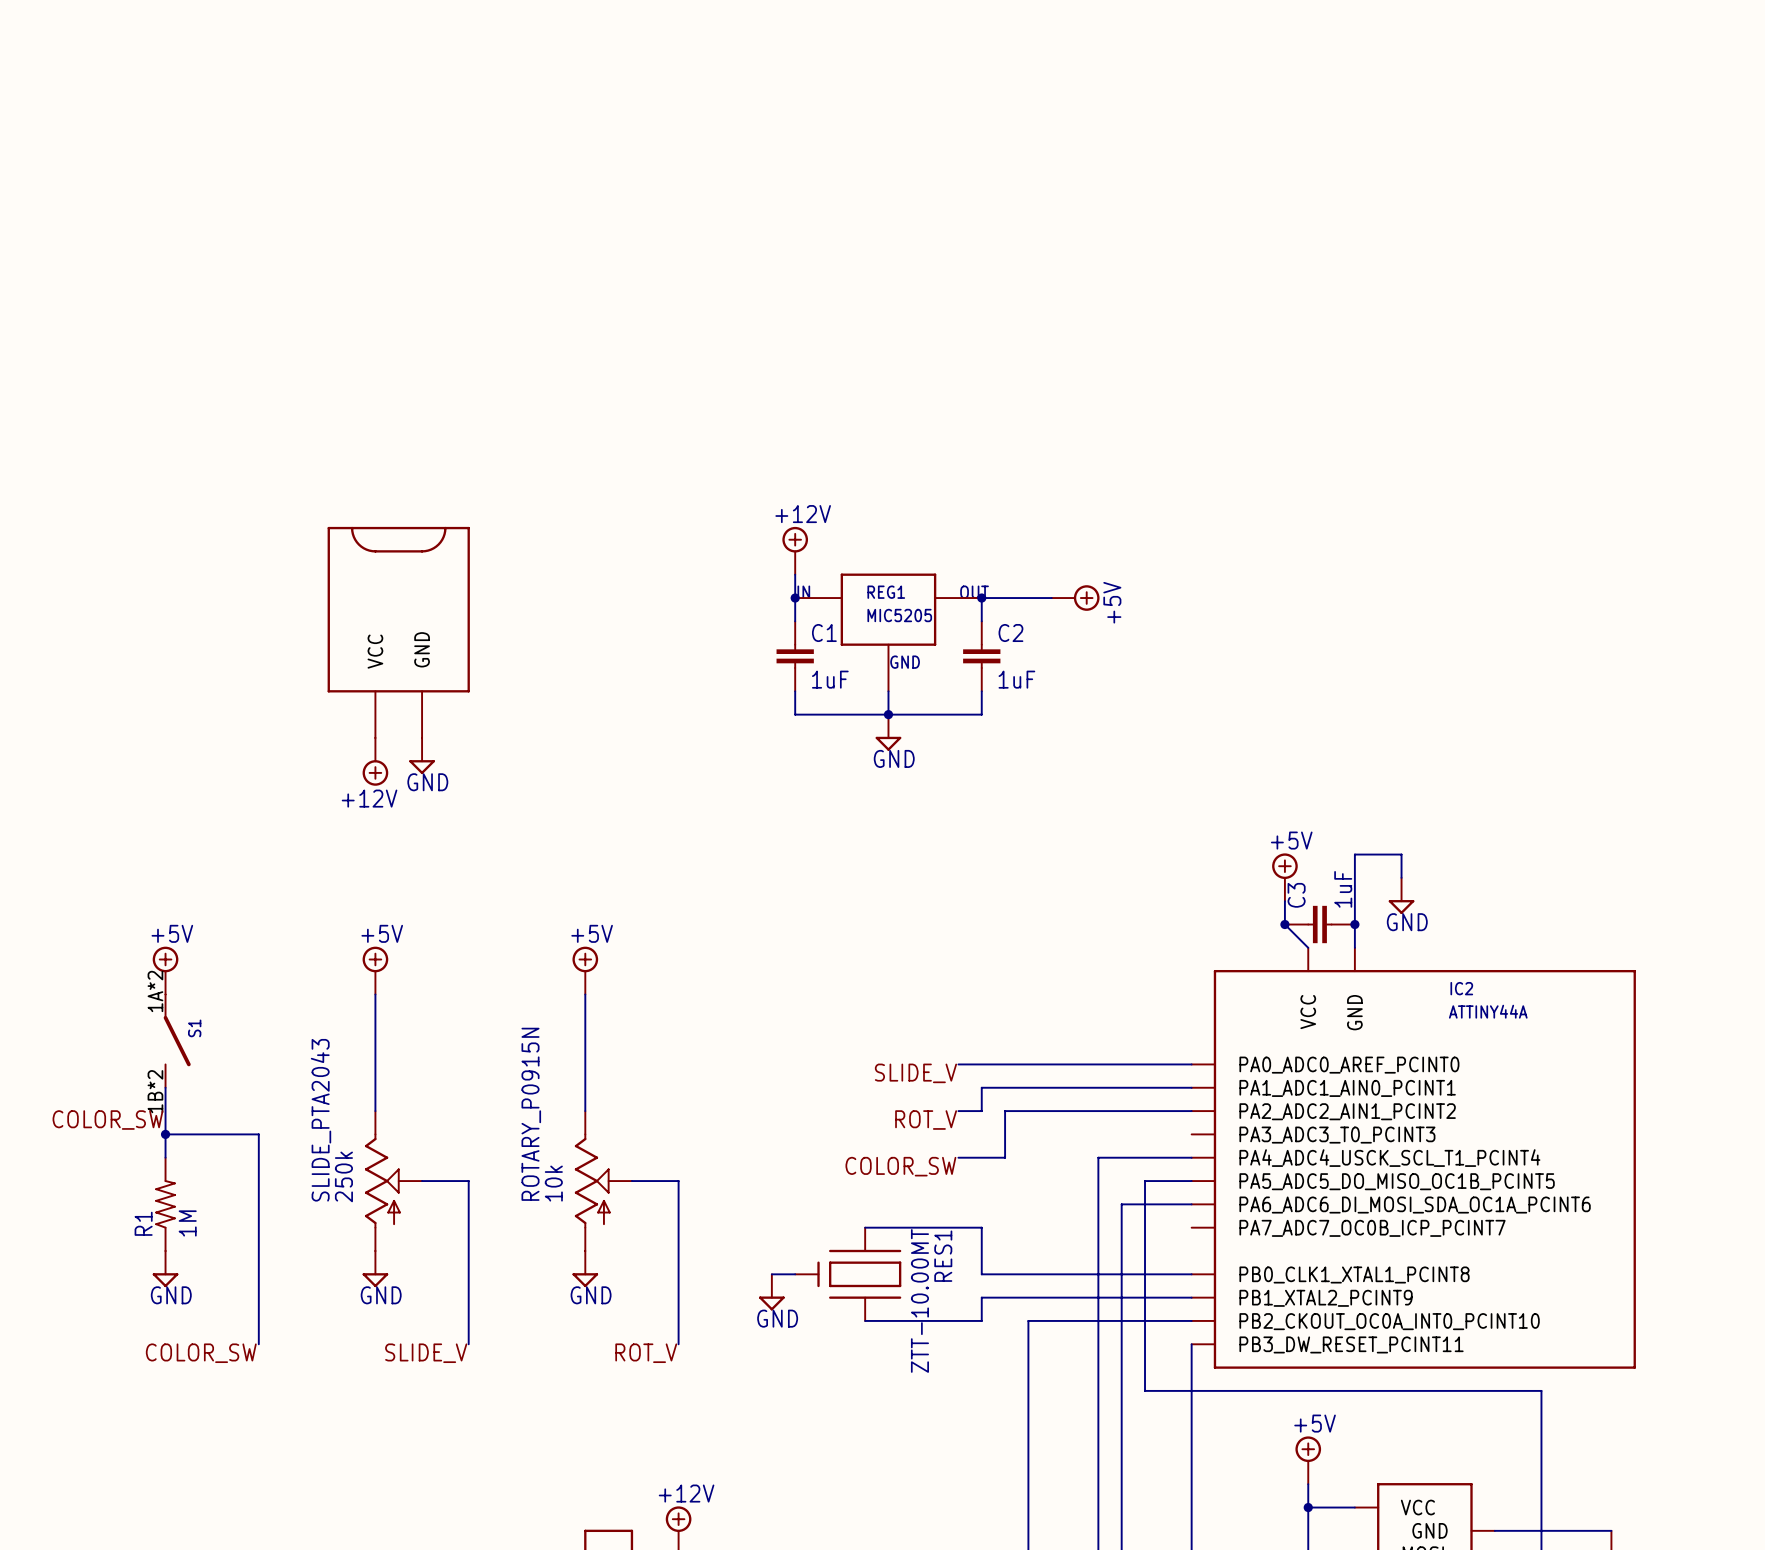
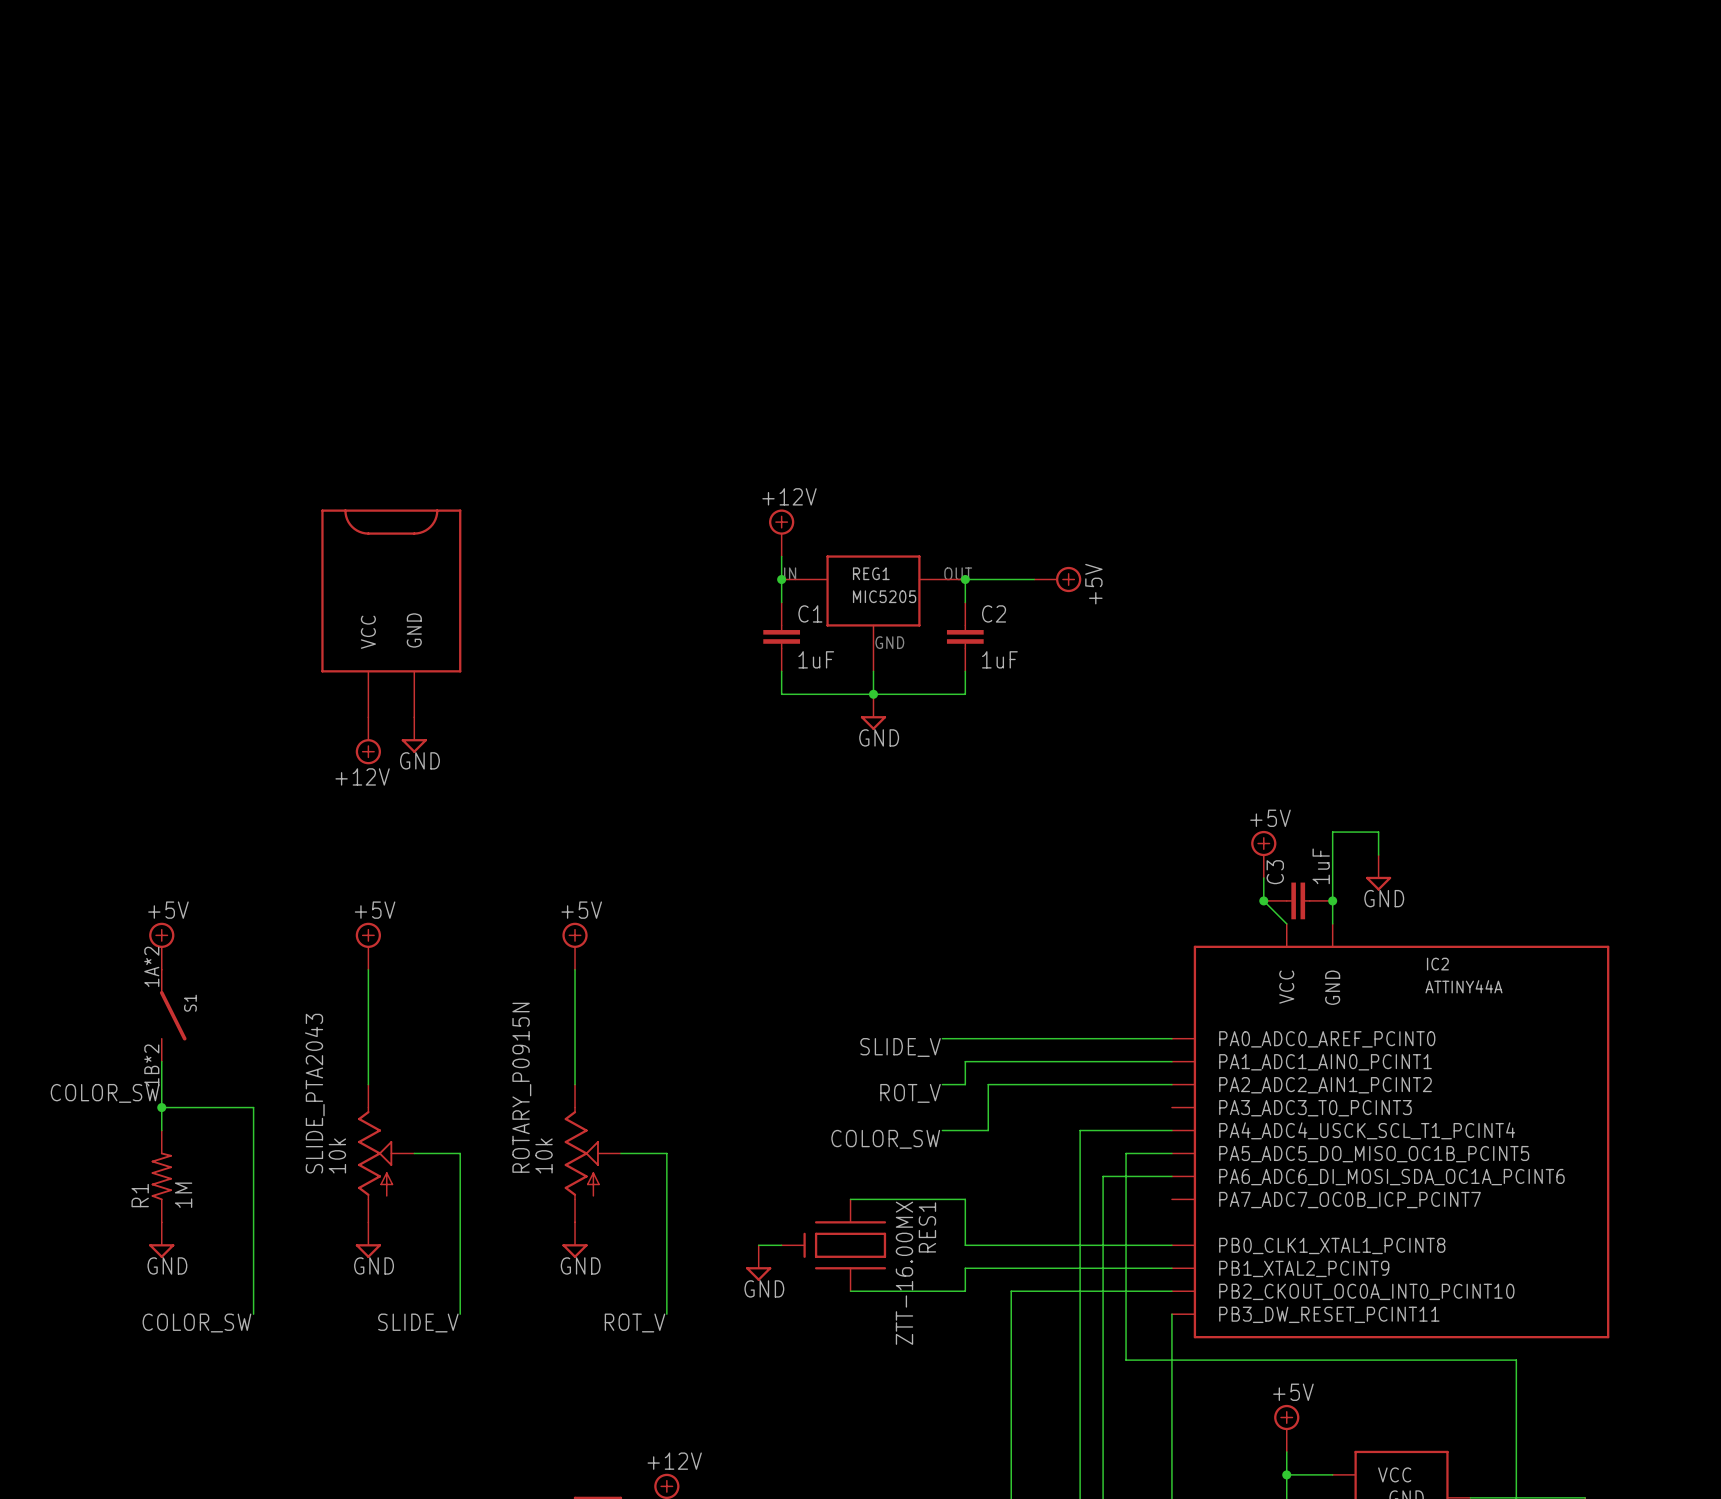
SLIDE_PTA2043 value: 250k (343, 1176) -> 10k (337, 1155)
RES1 value: ZTT-10.00MT (919, 1300) -> ZTT-16.00MX (904, 1273)

